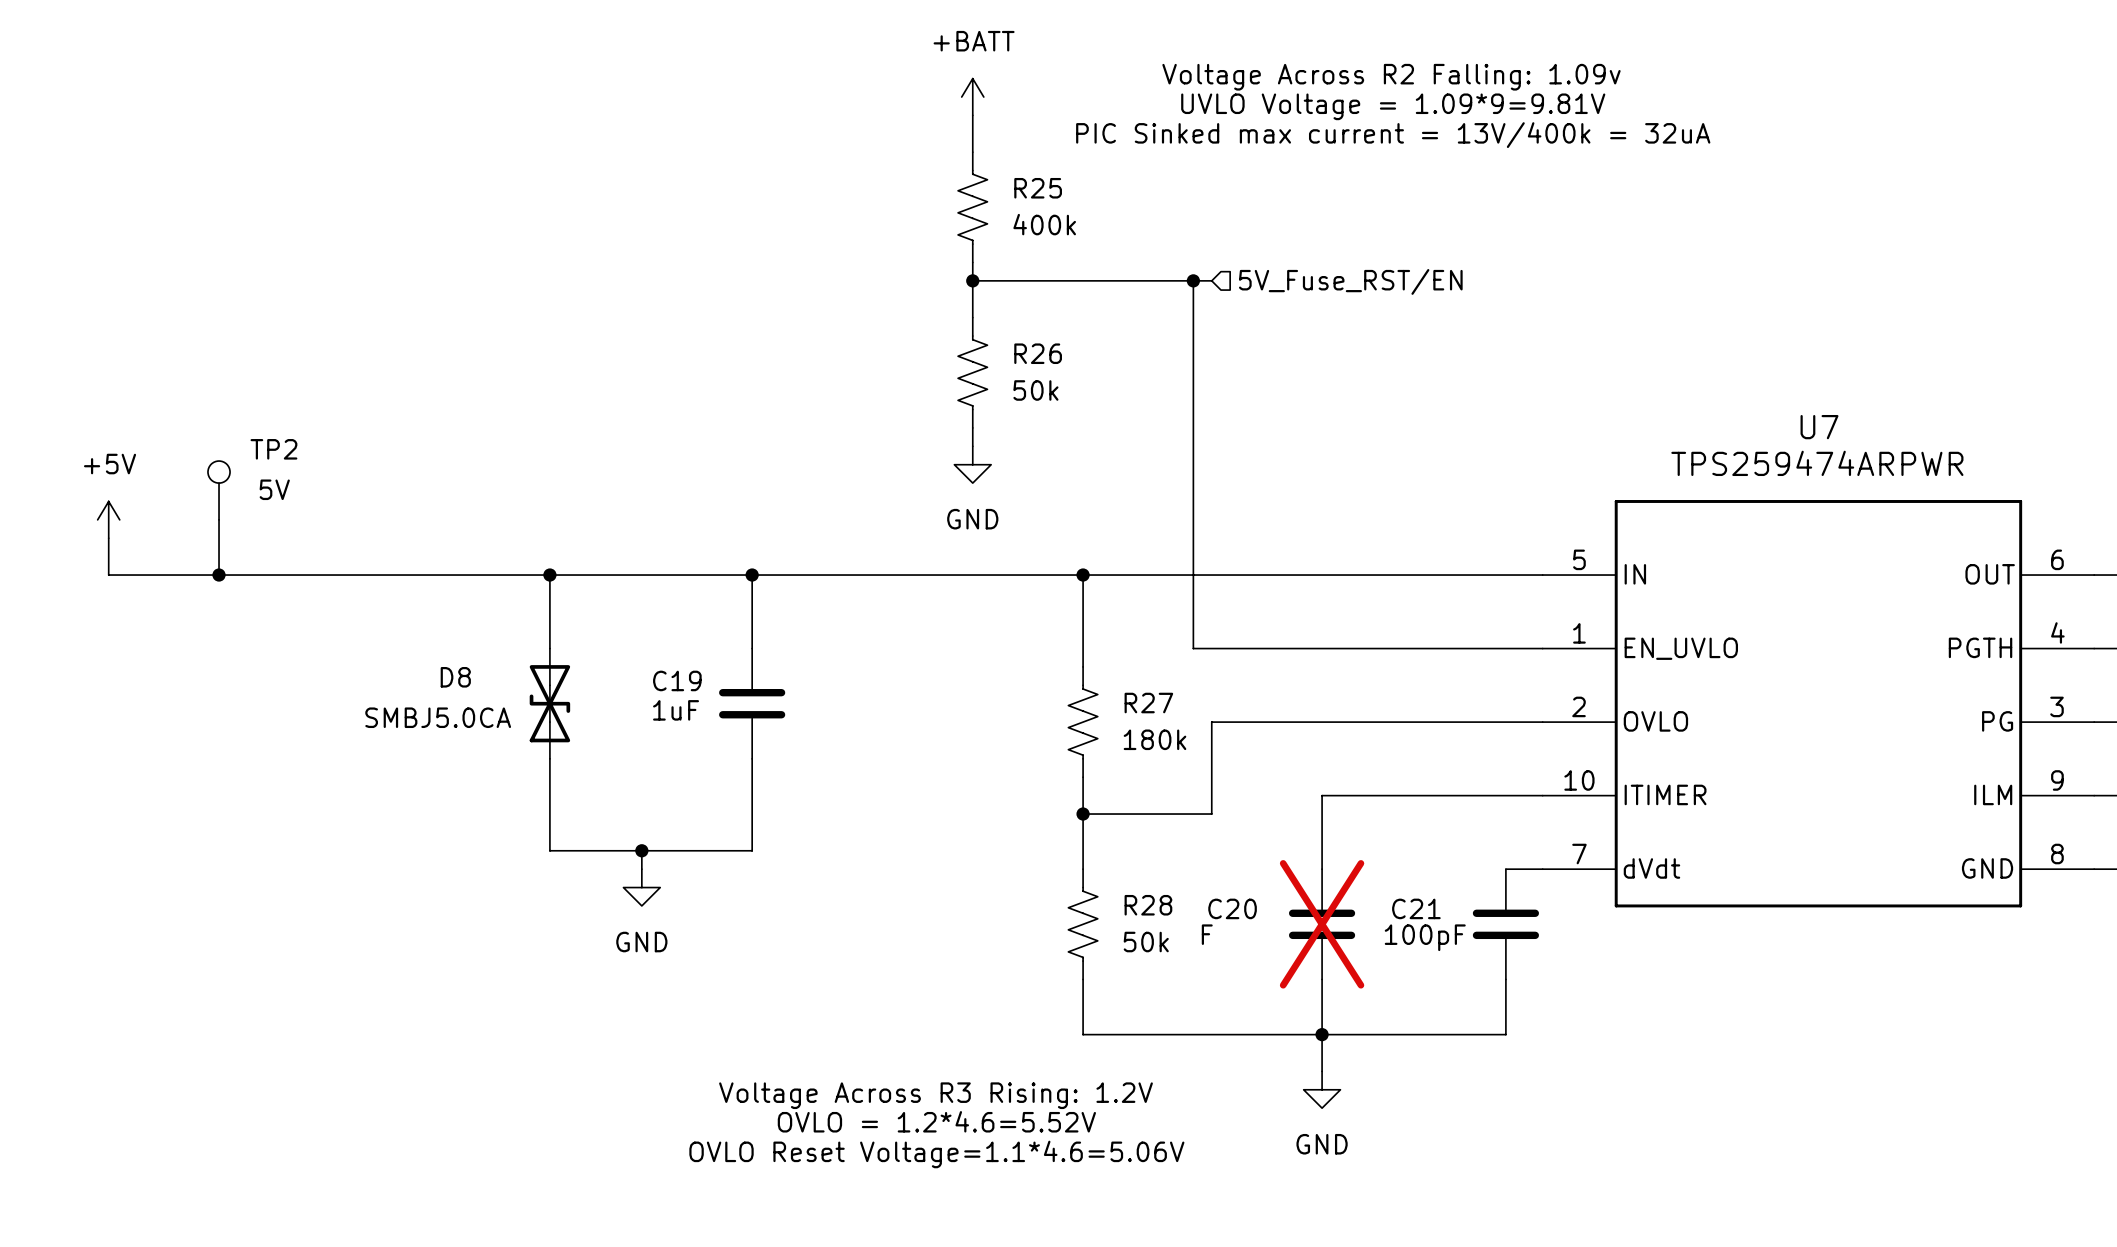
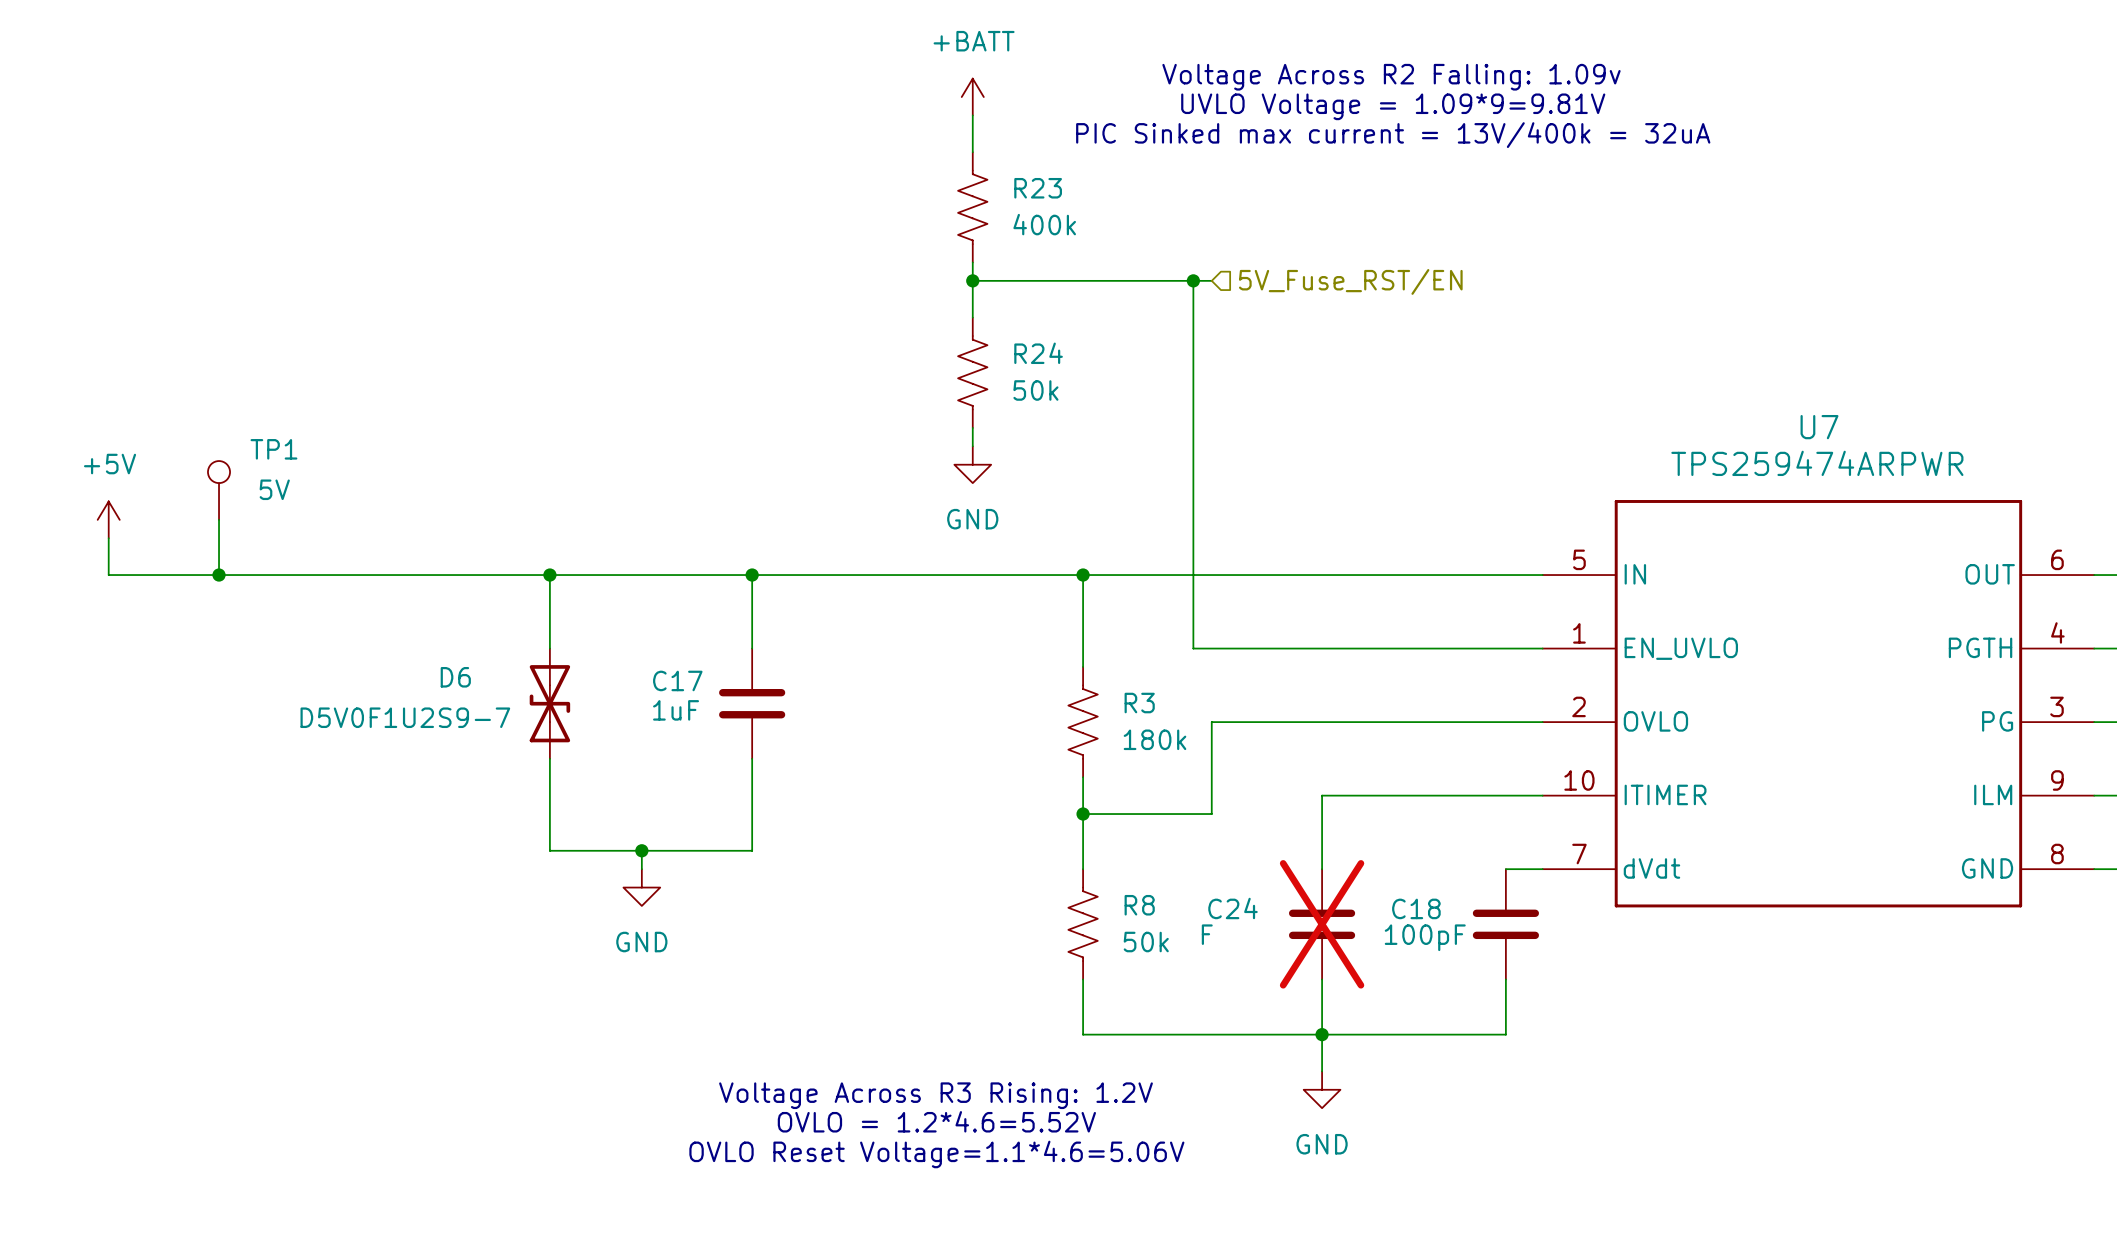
R25 name: R25 (1038, 188) -> R23 (1038, 188)
R26 name: R26 (1038, 353) -> R24 (1038, 353)
TP2 name: TP2 (273, 449) -> TP1 (273, 449)
D8 name: D8 (455, 677) -> D6 (455, 677)
C19 name: C19 (677, 680) -> C17 (677, 680)
R27 name: R27 (1148, 703) -> R3 (1139, 703)
D8 value: SMBJ5.0CA (438, 717) -> D5V0F1U2S9-7 (405, 717)
R28 name: R28 (1148, 905) -> R8 (1139, 905)
C20 name: C20 (1232, 908) -> C24 (1233, 908)
C21 name: C21 (1416, 908) -> C18 (1416, 908)

